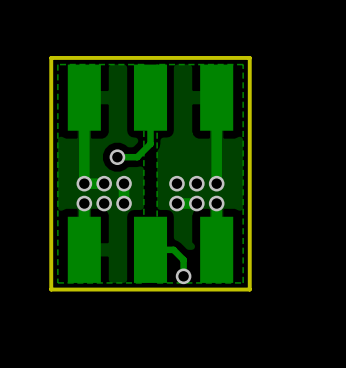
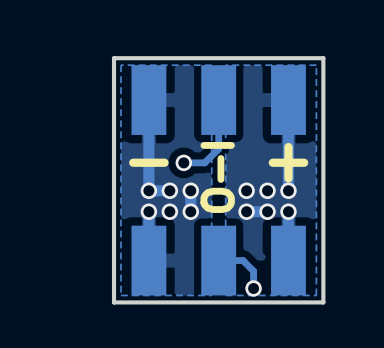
text: none -> - (148, 162)
text: none -> + (288, 162)
text: none -> O-I (217, 177)

